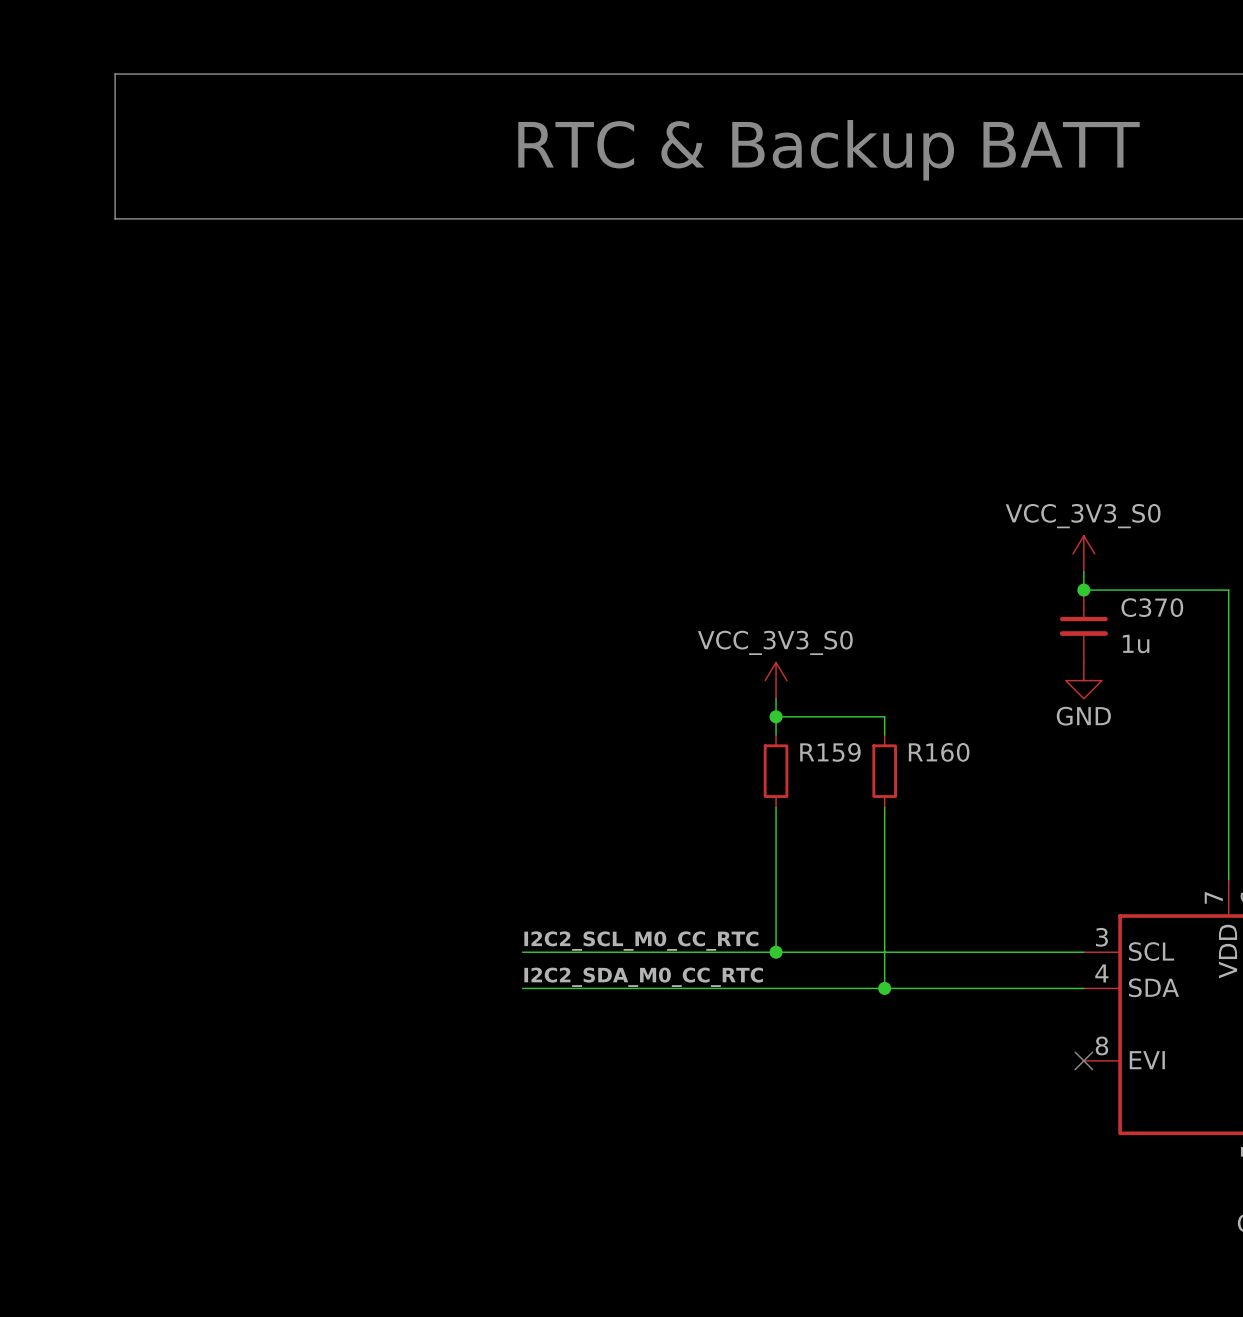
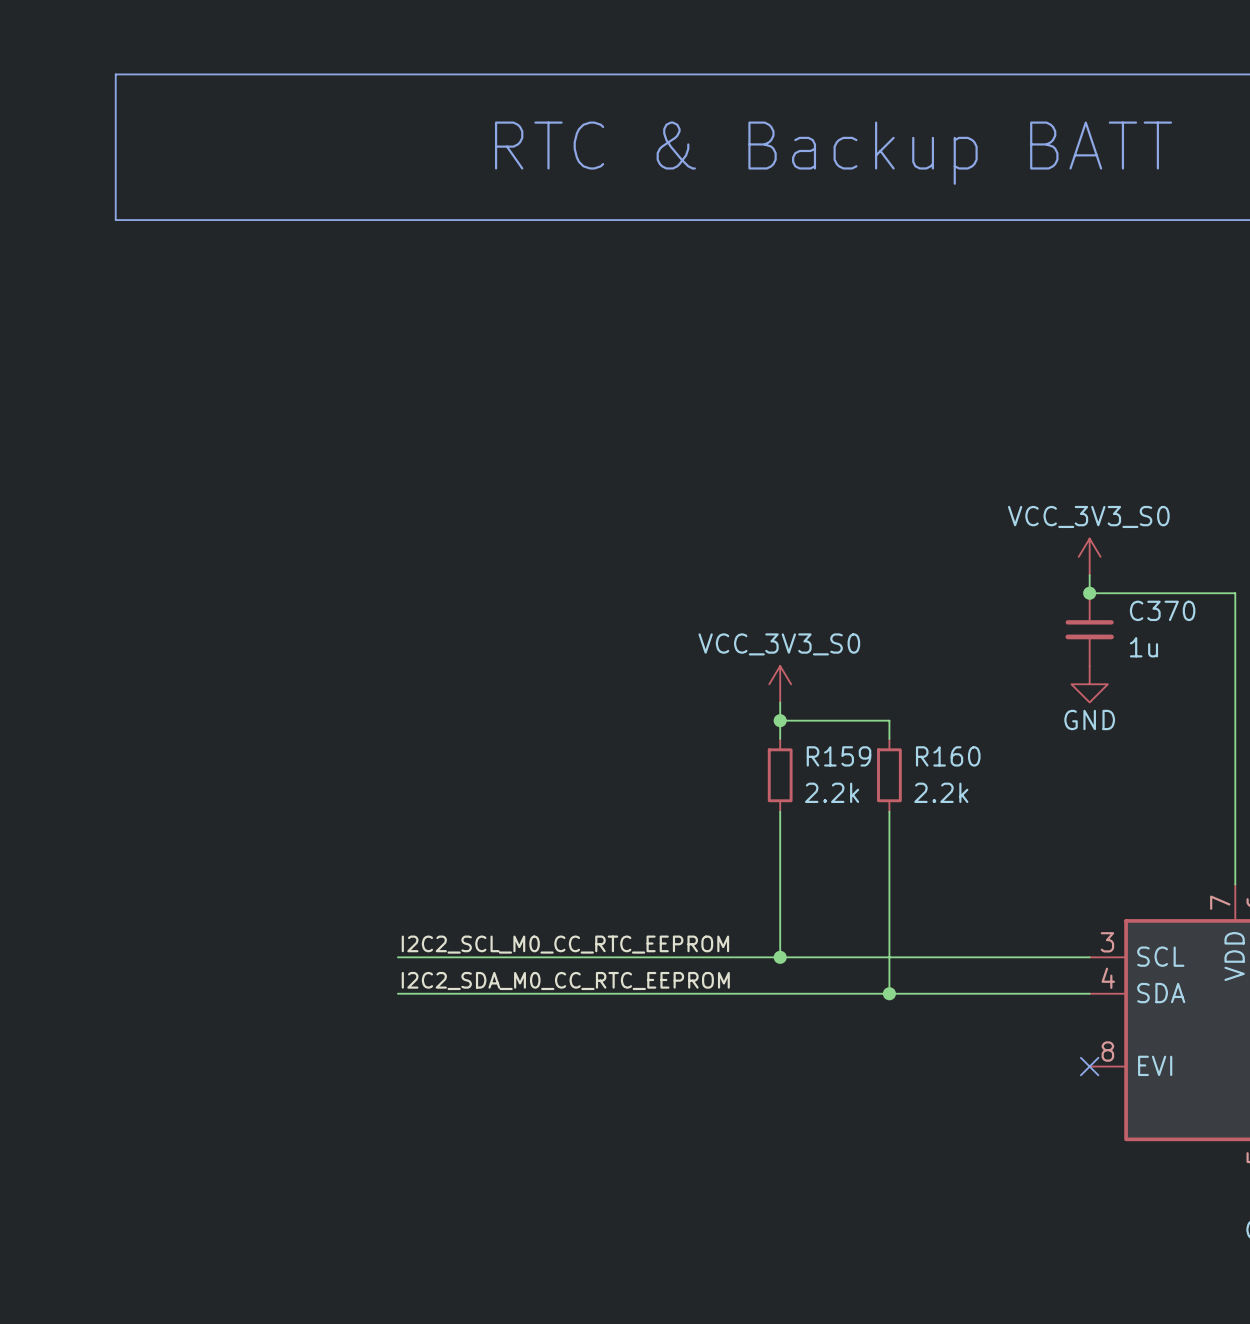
R159 value: none -> 2.2k (832, 792)
R160 value: none -> 2.2k (941, 792)
label: I2C2_SCL_M0_CC_RTC (641, 941) -> I2C2_SCL_M0_CC_RTC_EEPROM (565, 944)
wire: none -> (397, 957) (525, 957)
label: I2C2_SDA_M0_CC_RTC (643, 977) -> I2C2_SDA_M0_CC_RTC_EEPROM (565, 981)
wire: none -> (397, 993) (525, 993)

